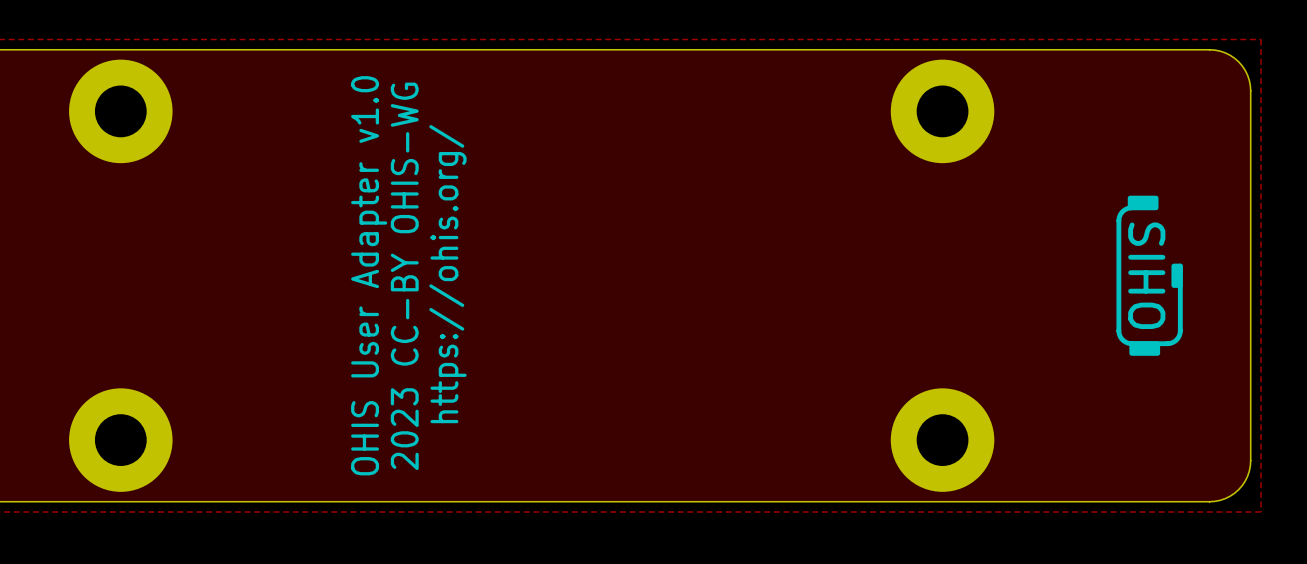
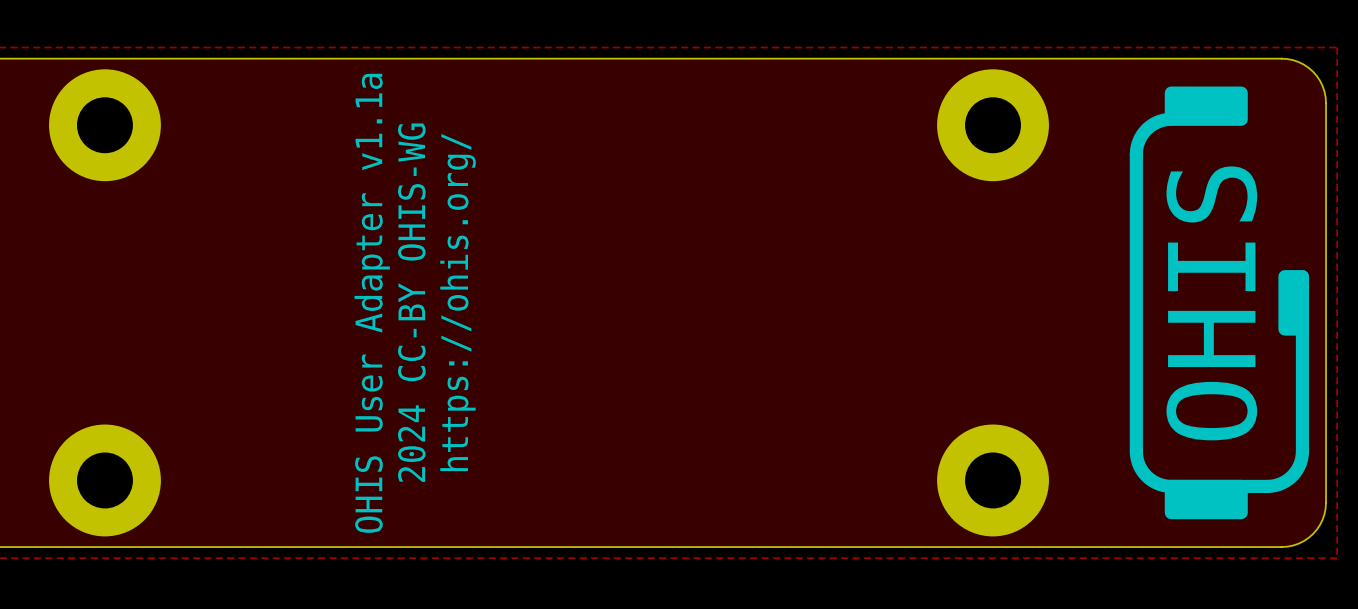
drawing shape: [1116, 195, 1183, 356] -> [1129, 86, 1309, 520]
text: OHIS User Adapter v1.0 (369, 275) -> OHIS User Adapter v1.1a (372, 303)
text: 2023 CC-BY OHIS-WG (404, 276) -> 2024 CC-BY OHIS-WG (411, 302)

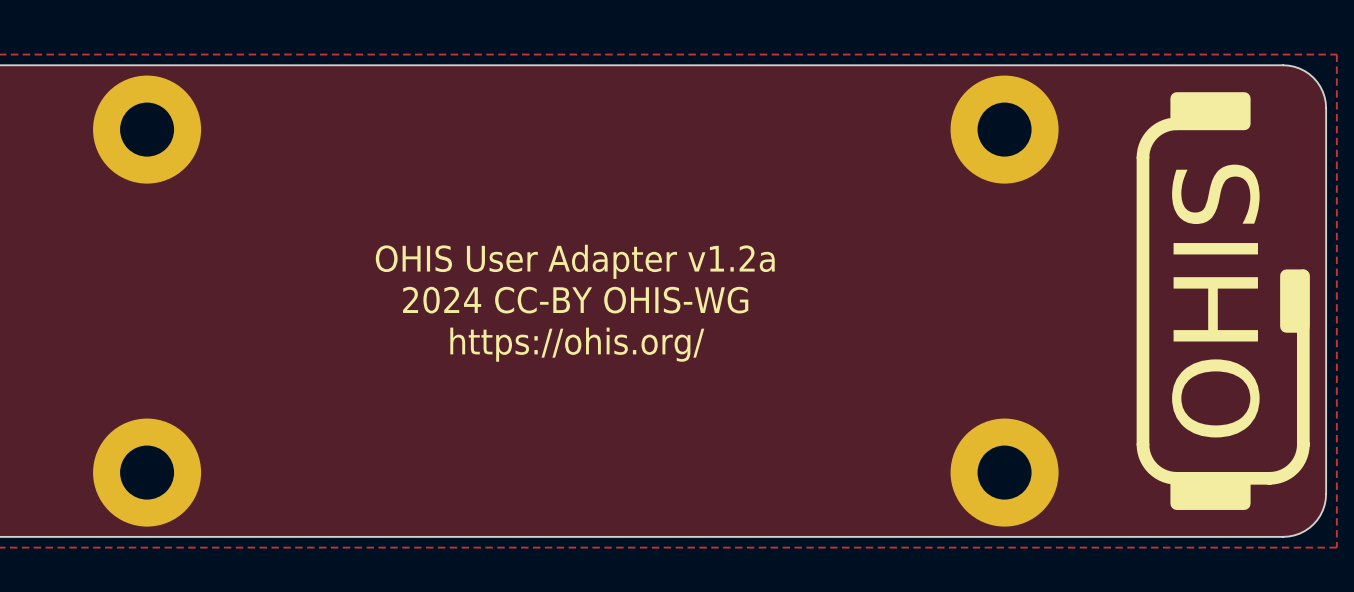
text rotation: 0° (411, 302) -> 90° clockwise (575, 300)
text rotation: 0° (458, 302) -> 90° clockwise (577, 344)
text: OHIS User Adapter v1.1a (372, 303) -> OHIS User Adapter v1.2a (575, 261)

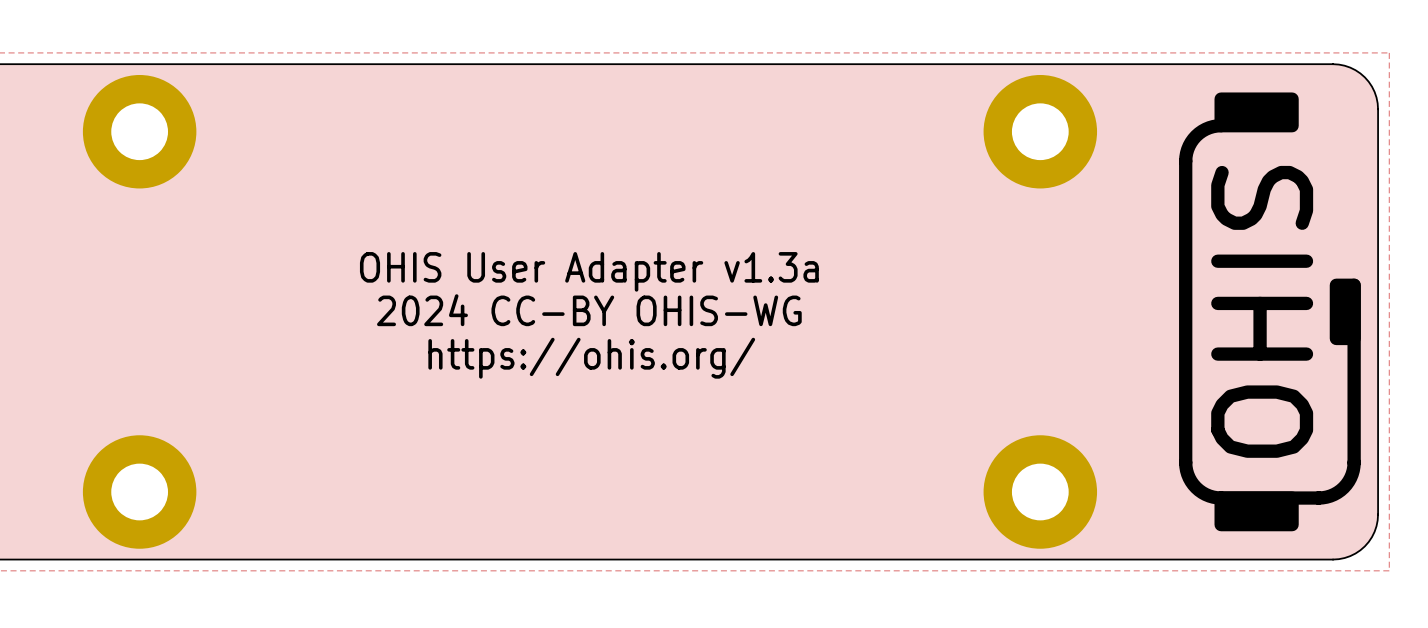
text: OHIS User Adapter v1.2a (575, 261) -> OHIS User Adapter v1.3a (589, 271)

